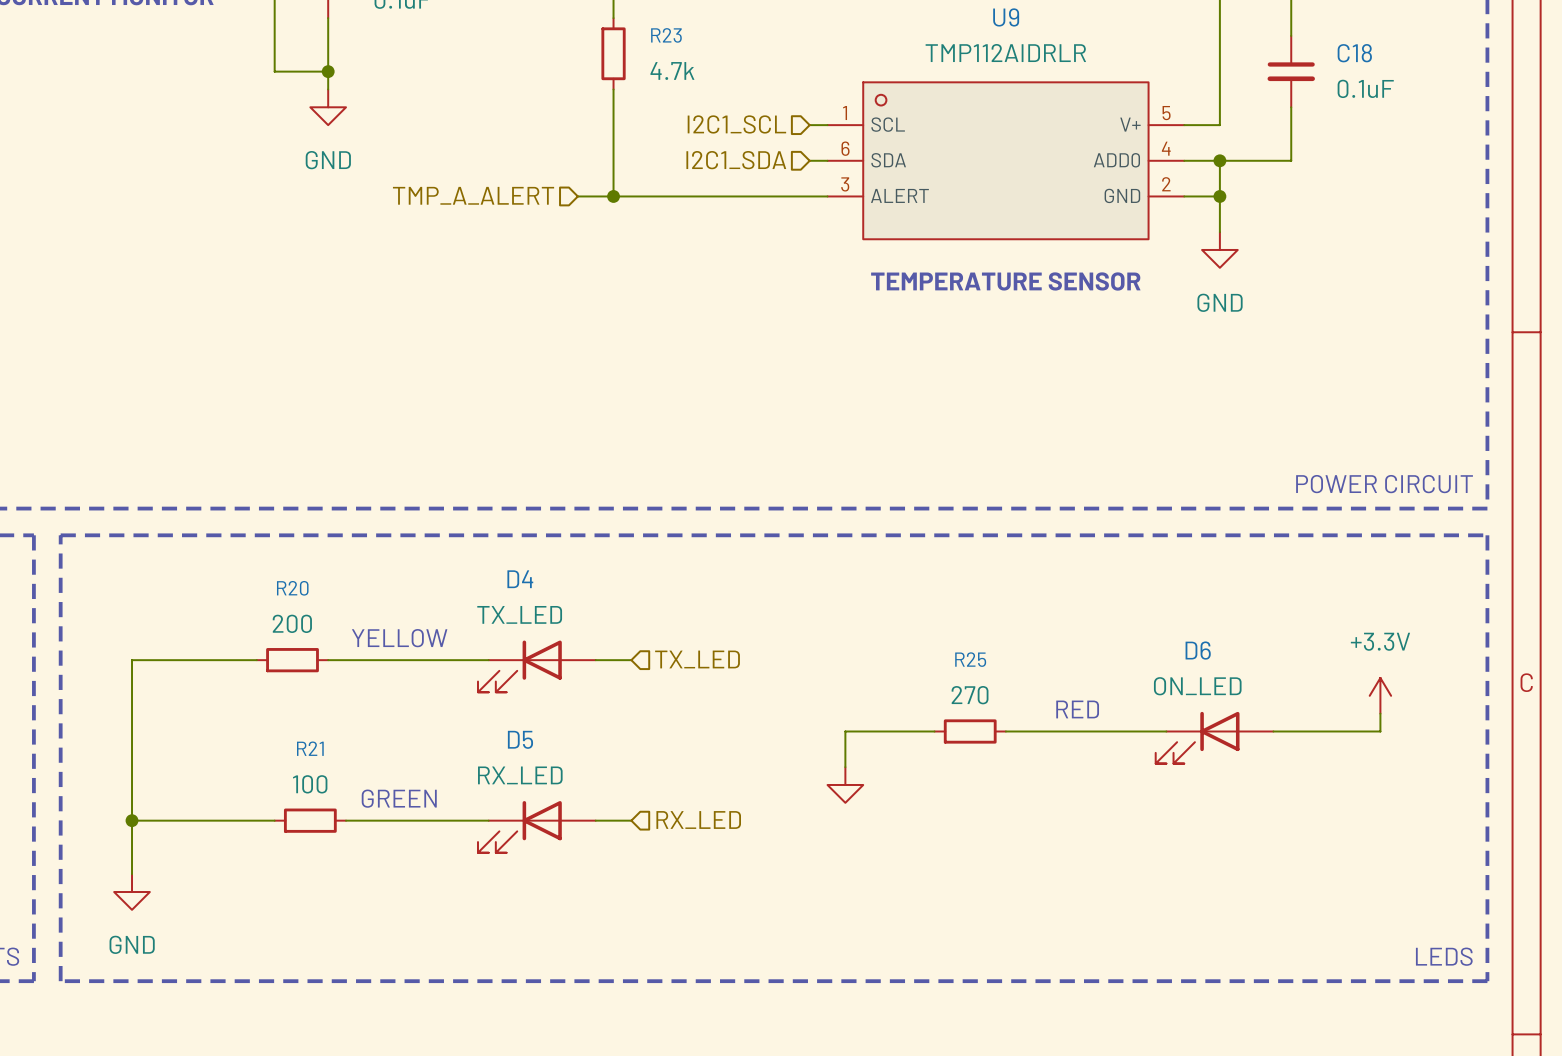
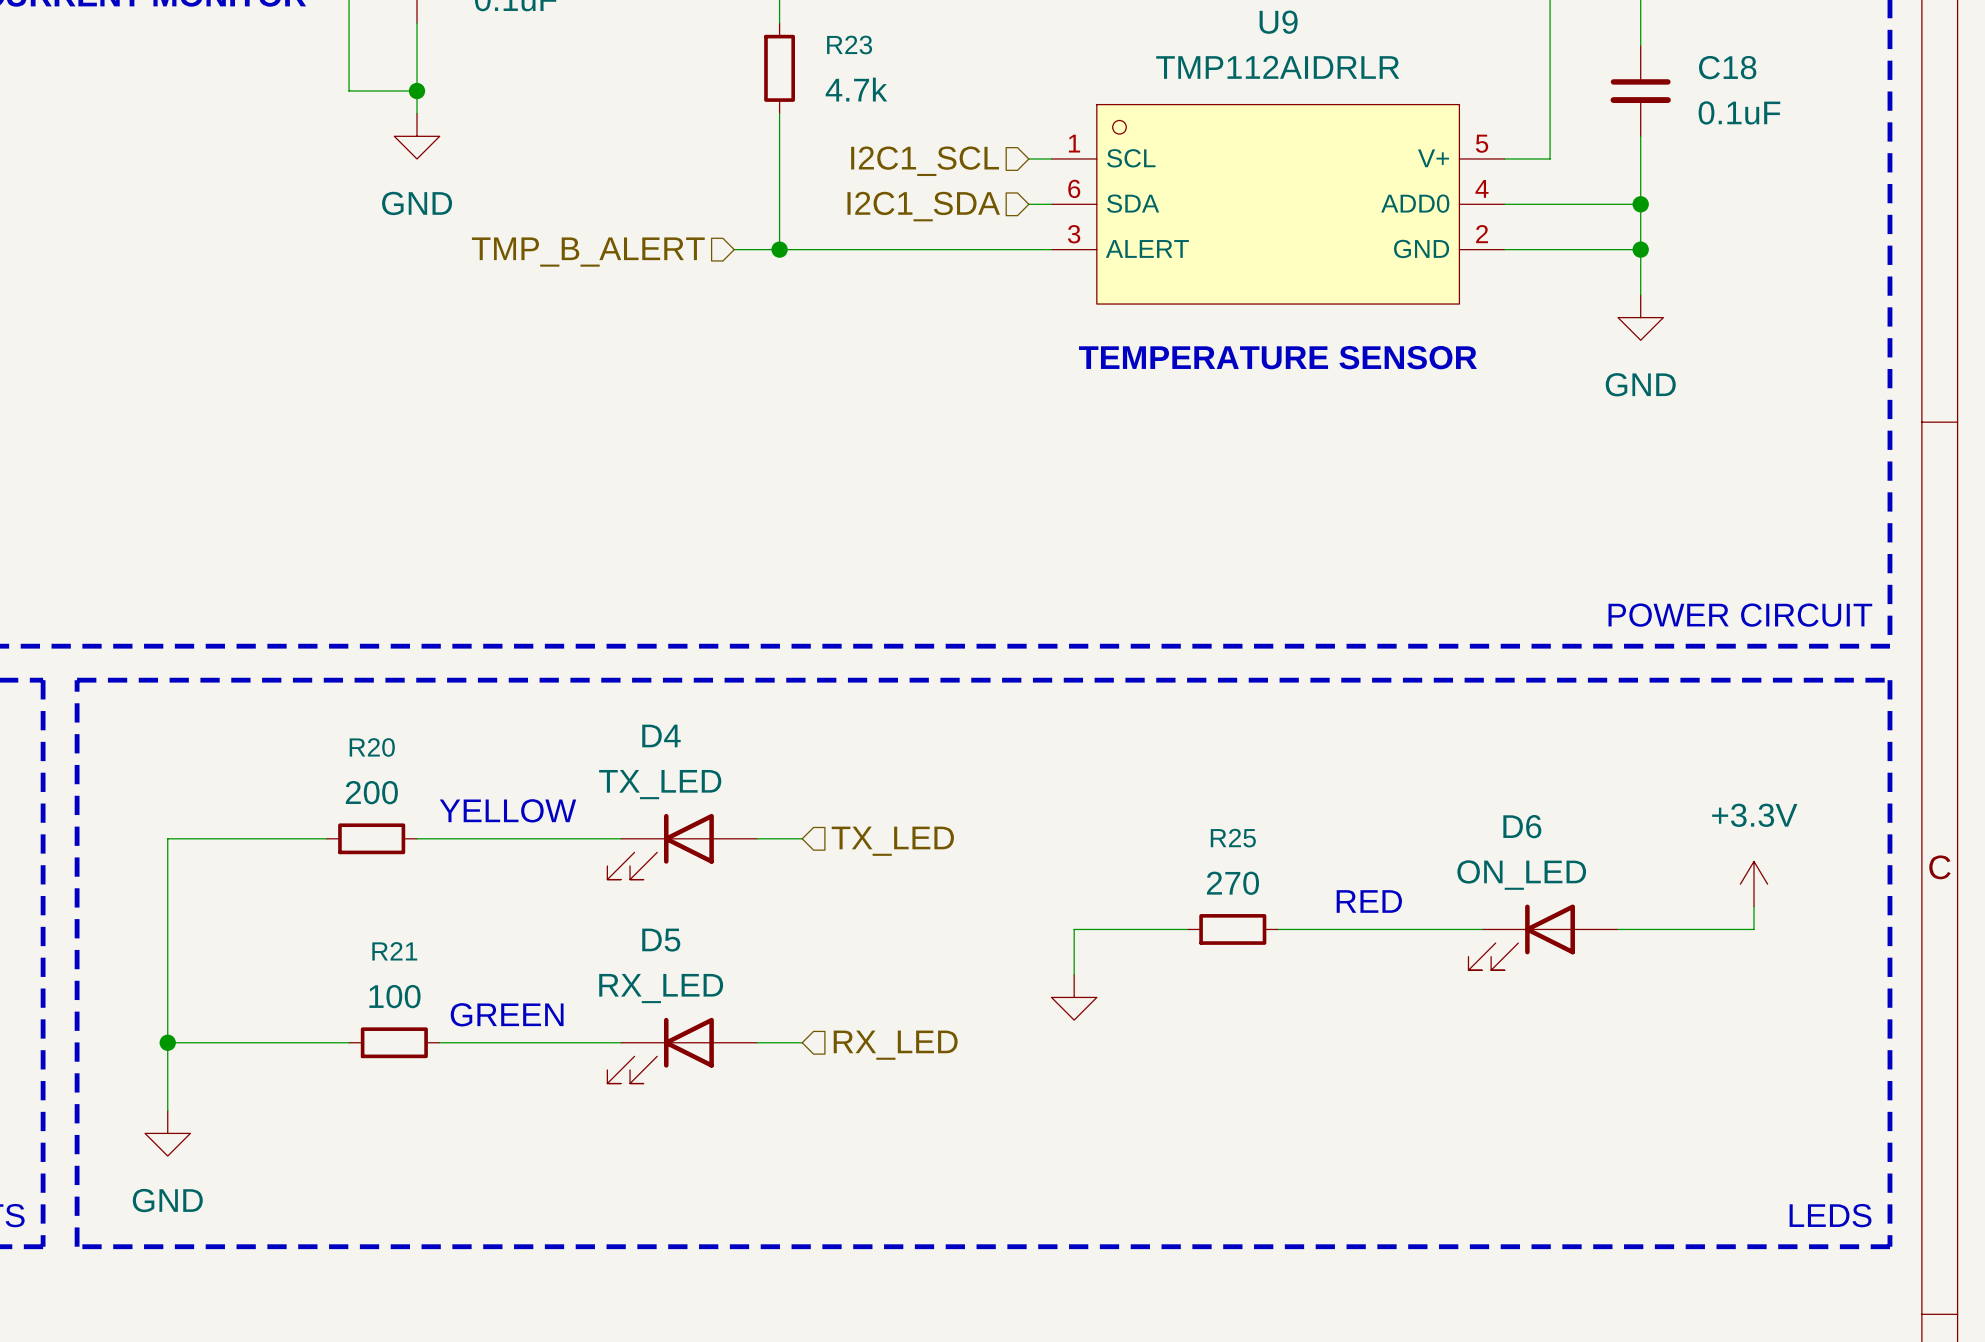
wire: (1219, 160) (1219, 232) -> (1640, 204) (1640, 294)
junction: (1219, 160) -> none
junction: none -> (1640, 204)
hierarchical label: TMP_A_ALERT (473, 195) -> TMP_B_ALERT (588, 252)
wire: none -> (1550, 249) (1640, 249)
junction: (1219, 196) -> none
junction: none -> (1640, 249)
power symbol position: GND (1219, 249) -> GND (1640, 317)

